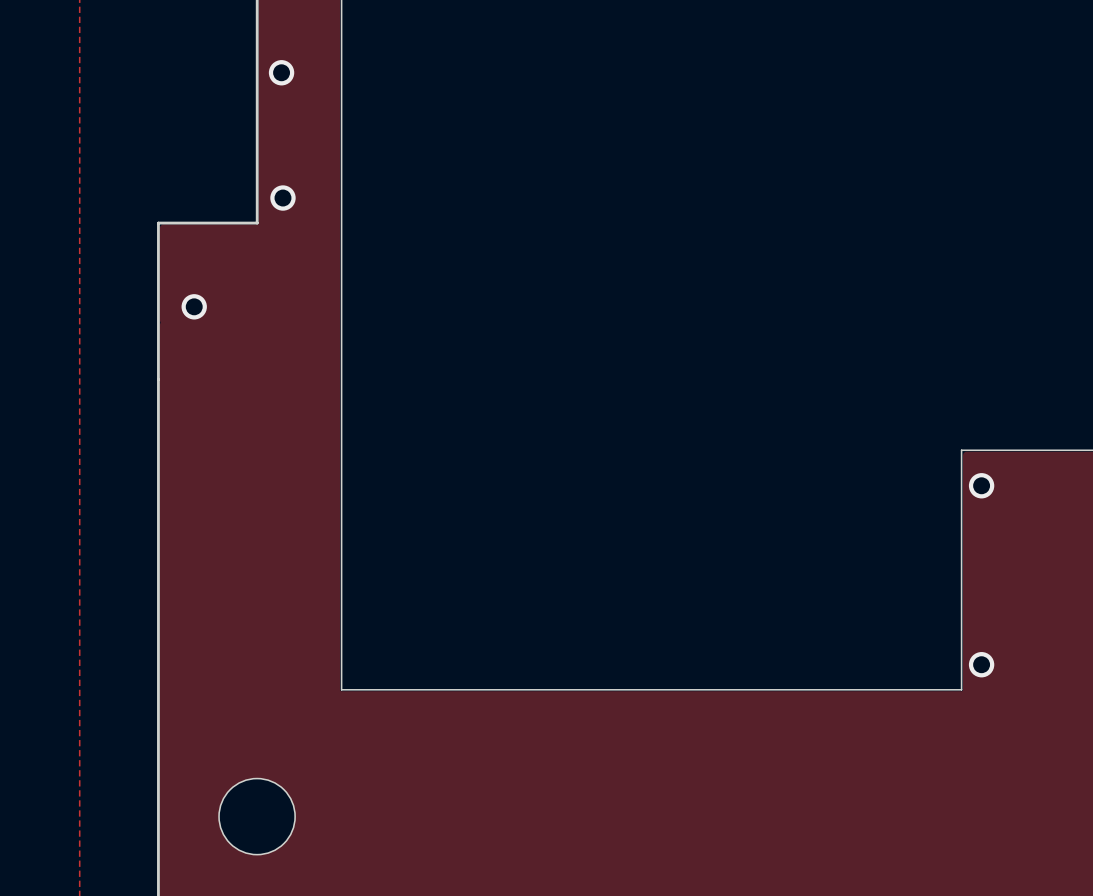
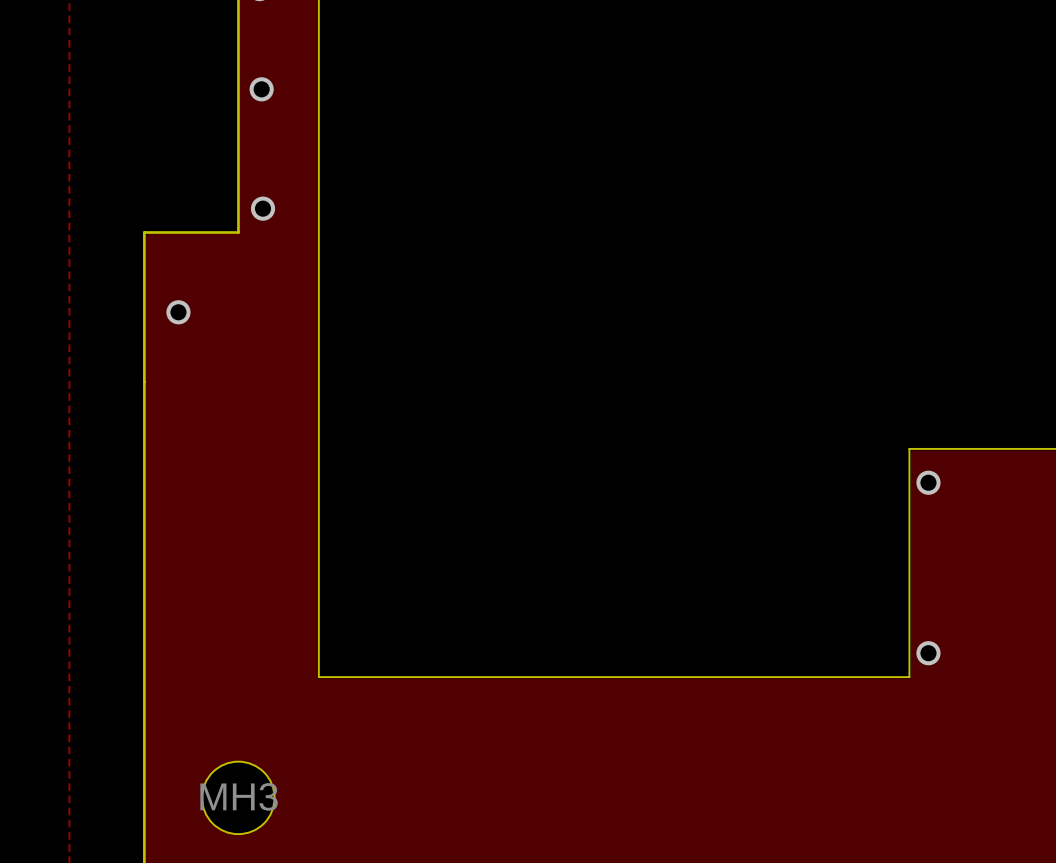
MH3 name: none -> MH3 (239, 796)

